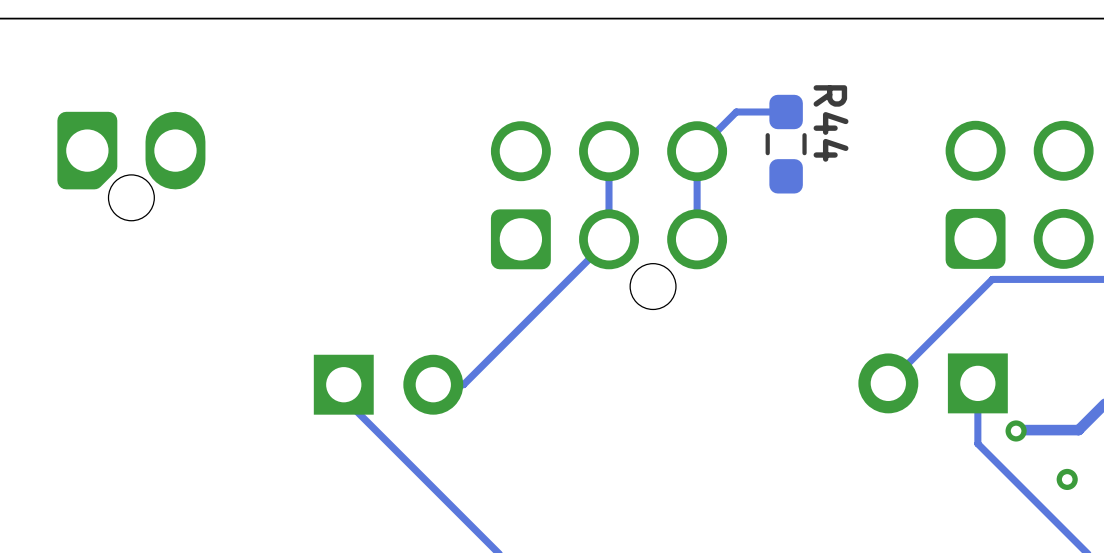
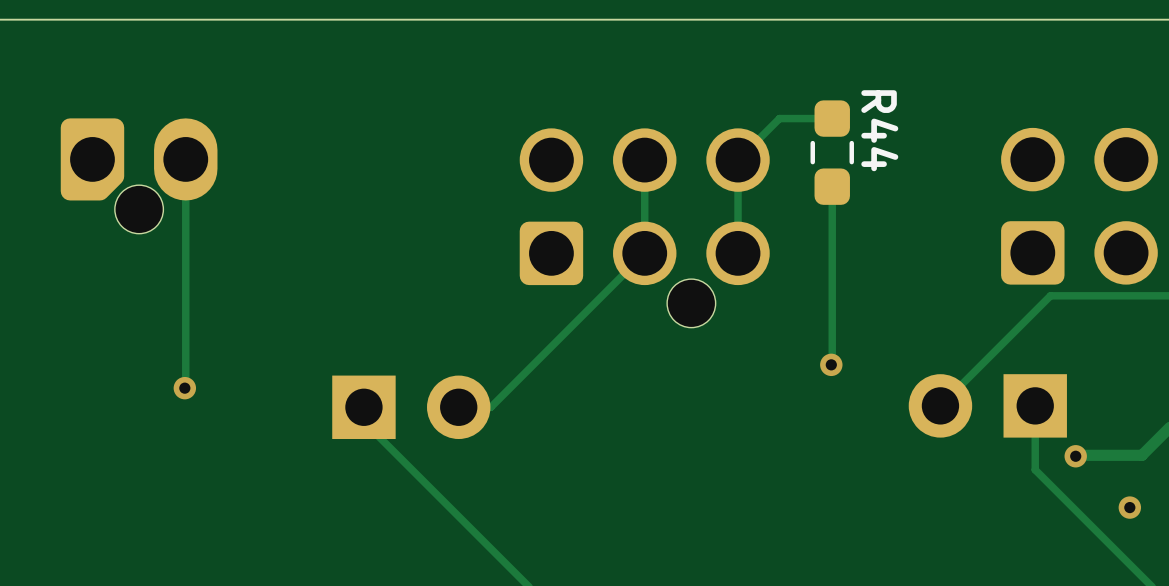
track: none -> (185, 159) (184, 388)
track: none -> (832, 186) (831, 364)
via: none -> (831, 364)
via: none -> (184, 388)

